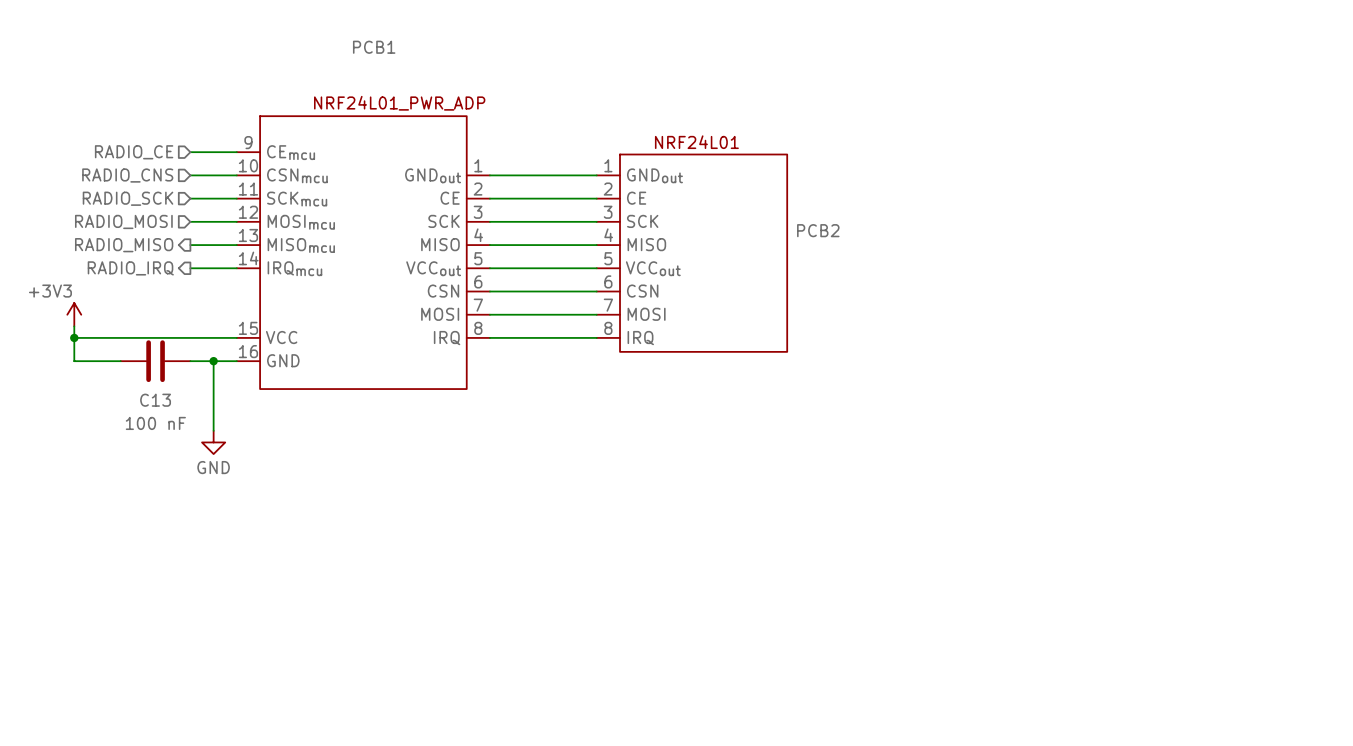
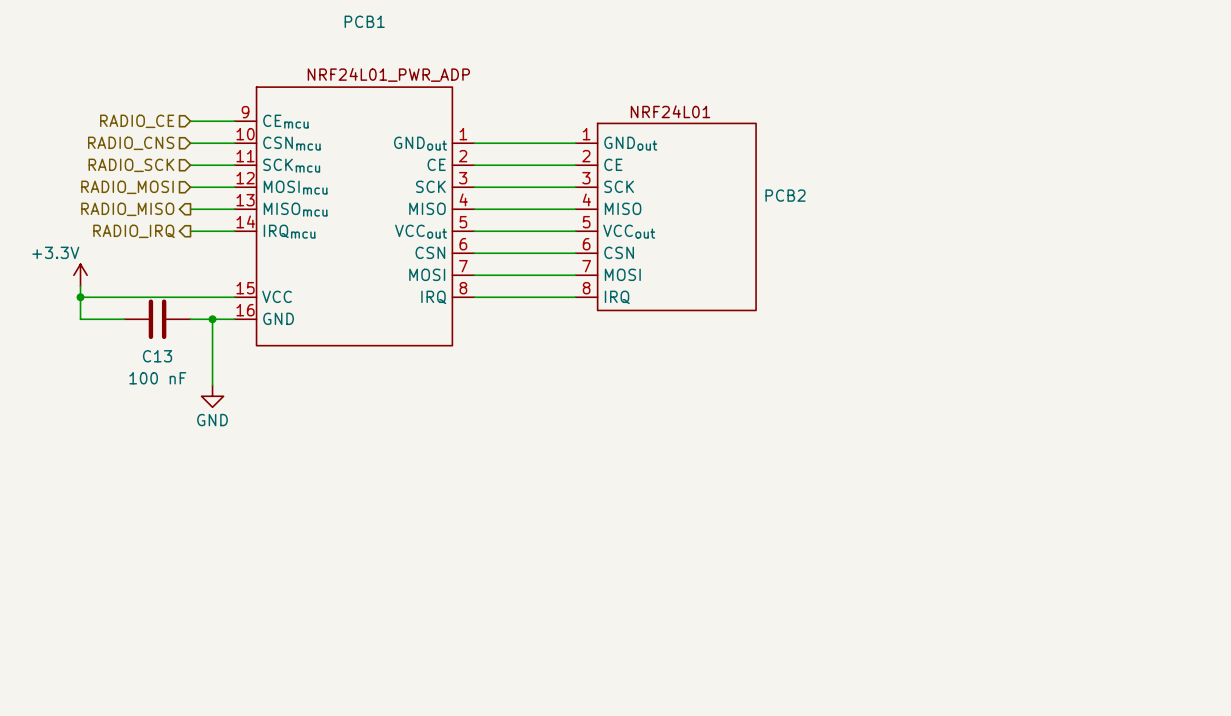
power symbol: +3V3 (74, 314) -> +3.3V (80, 275)

